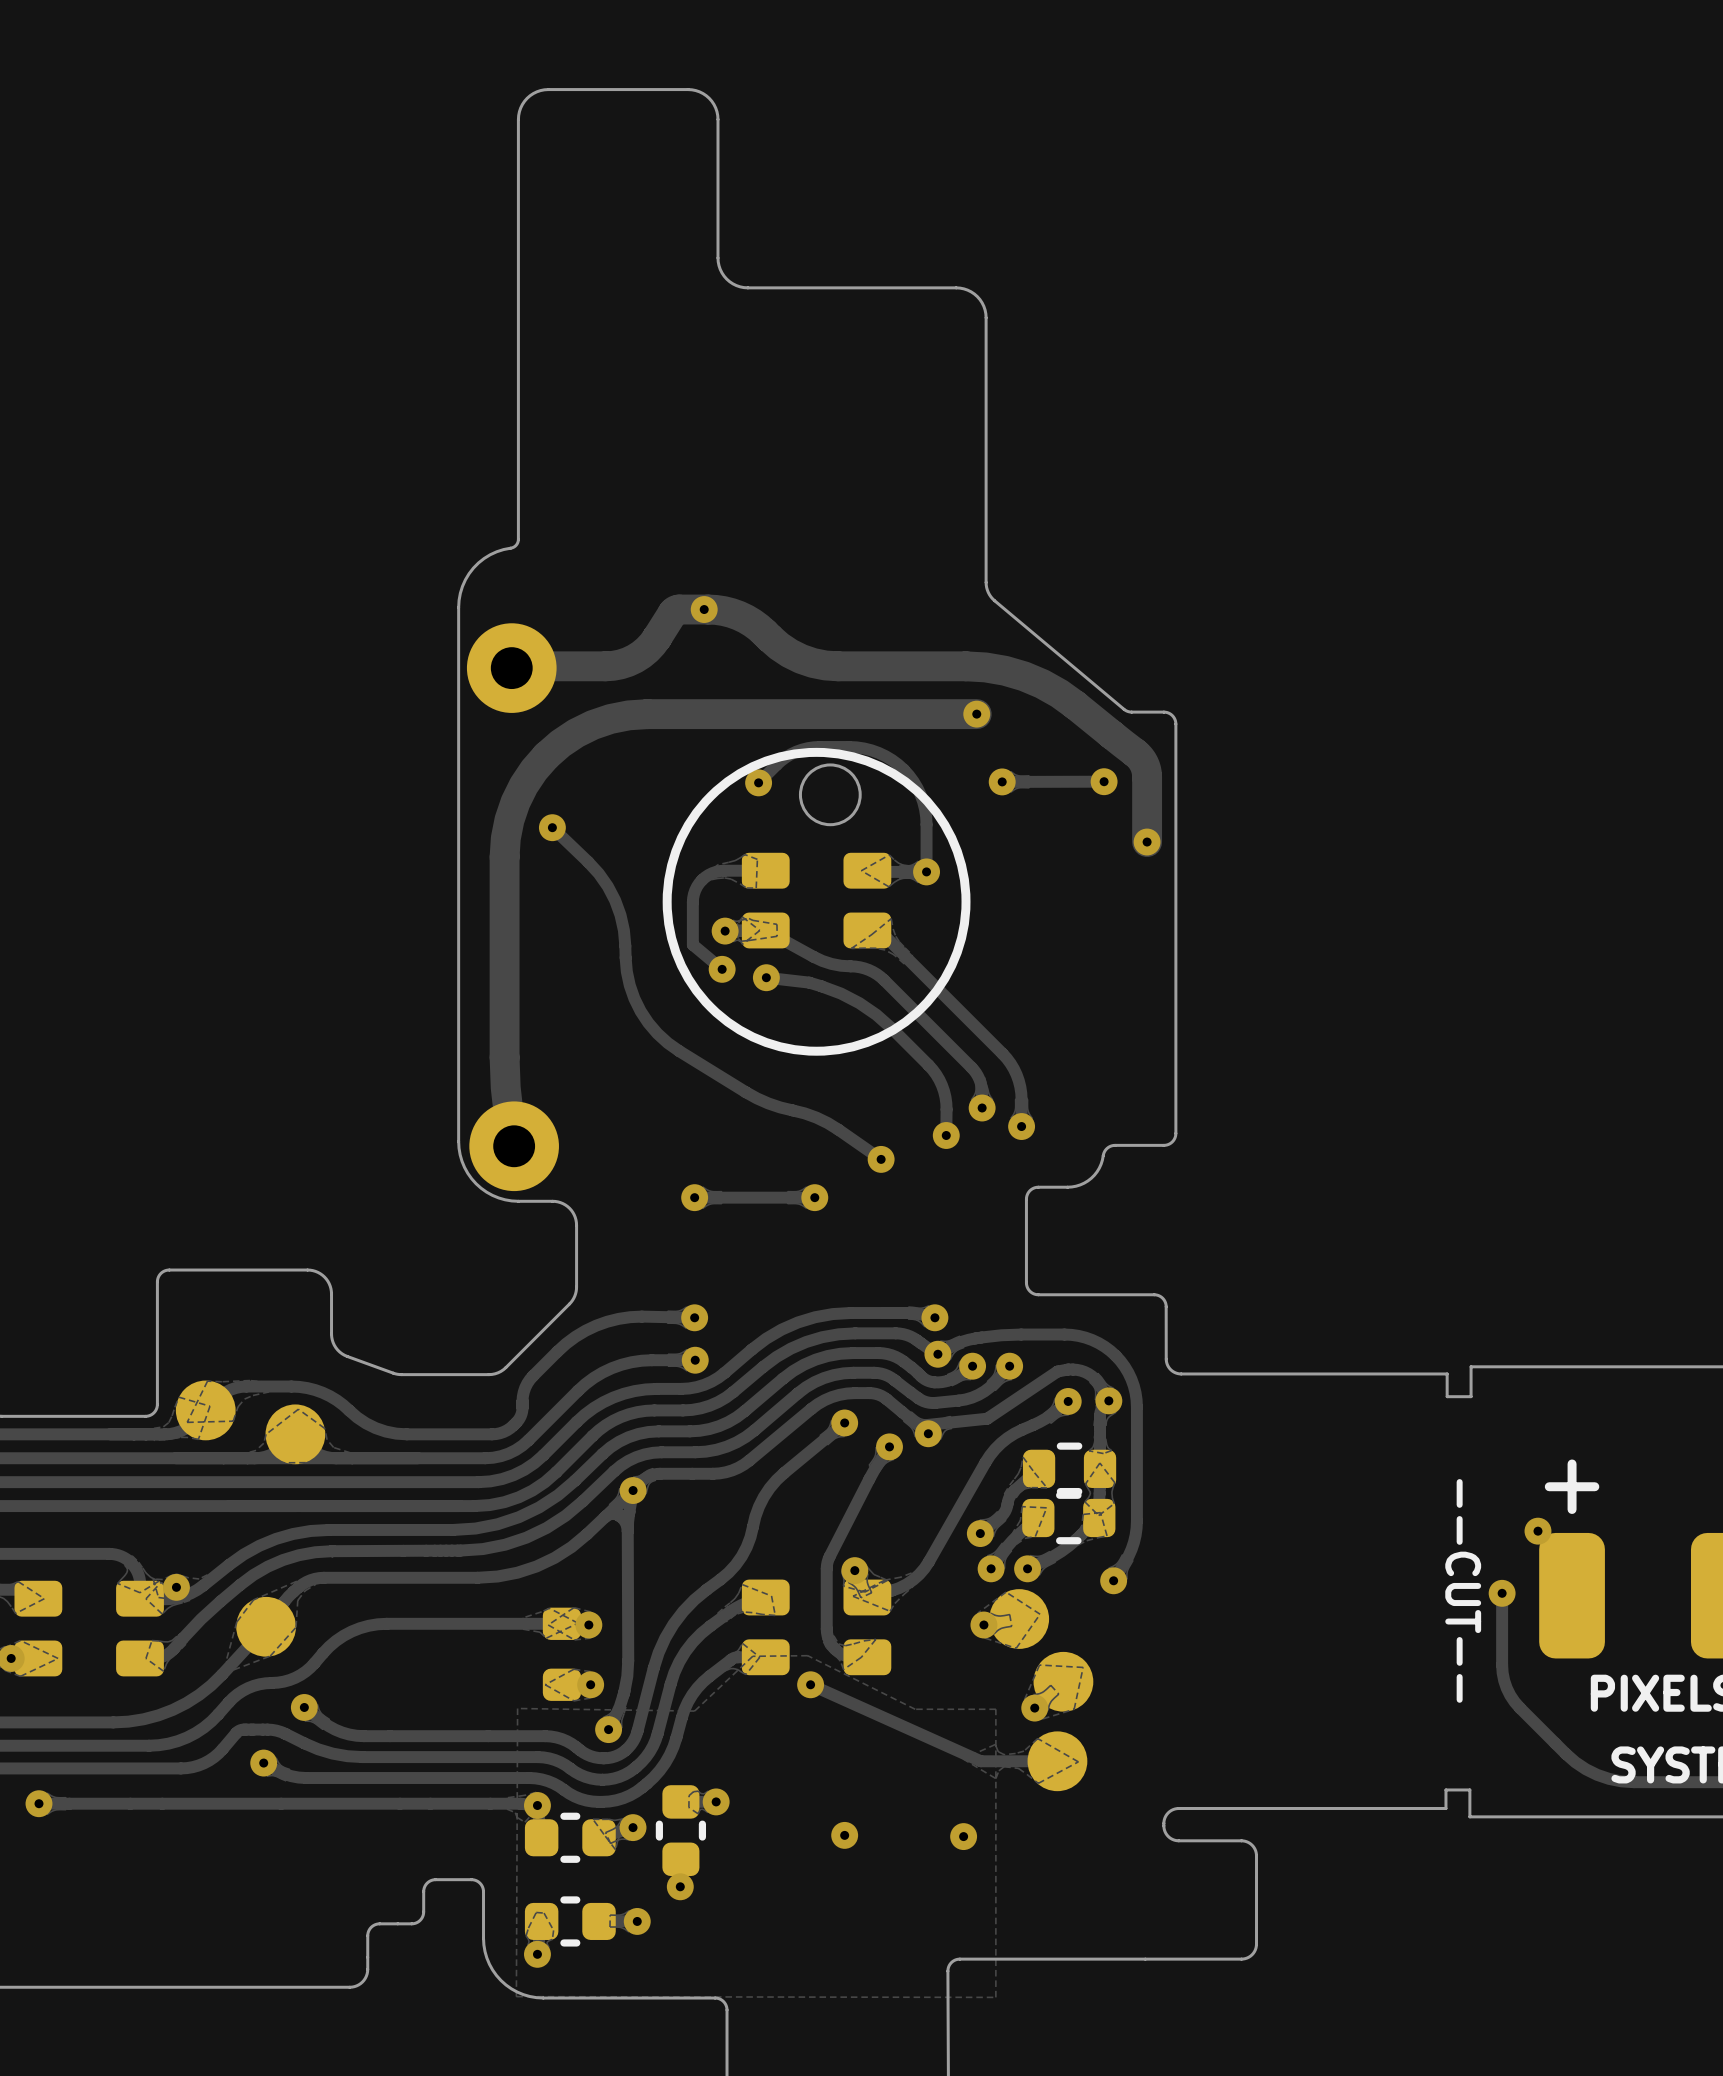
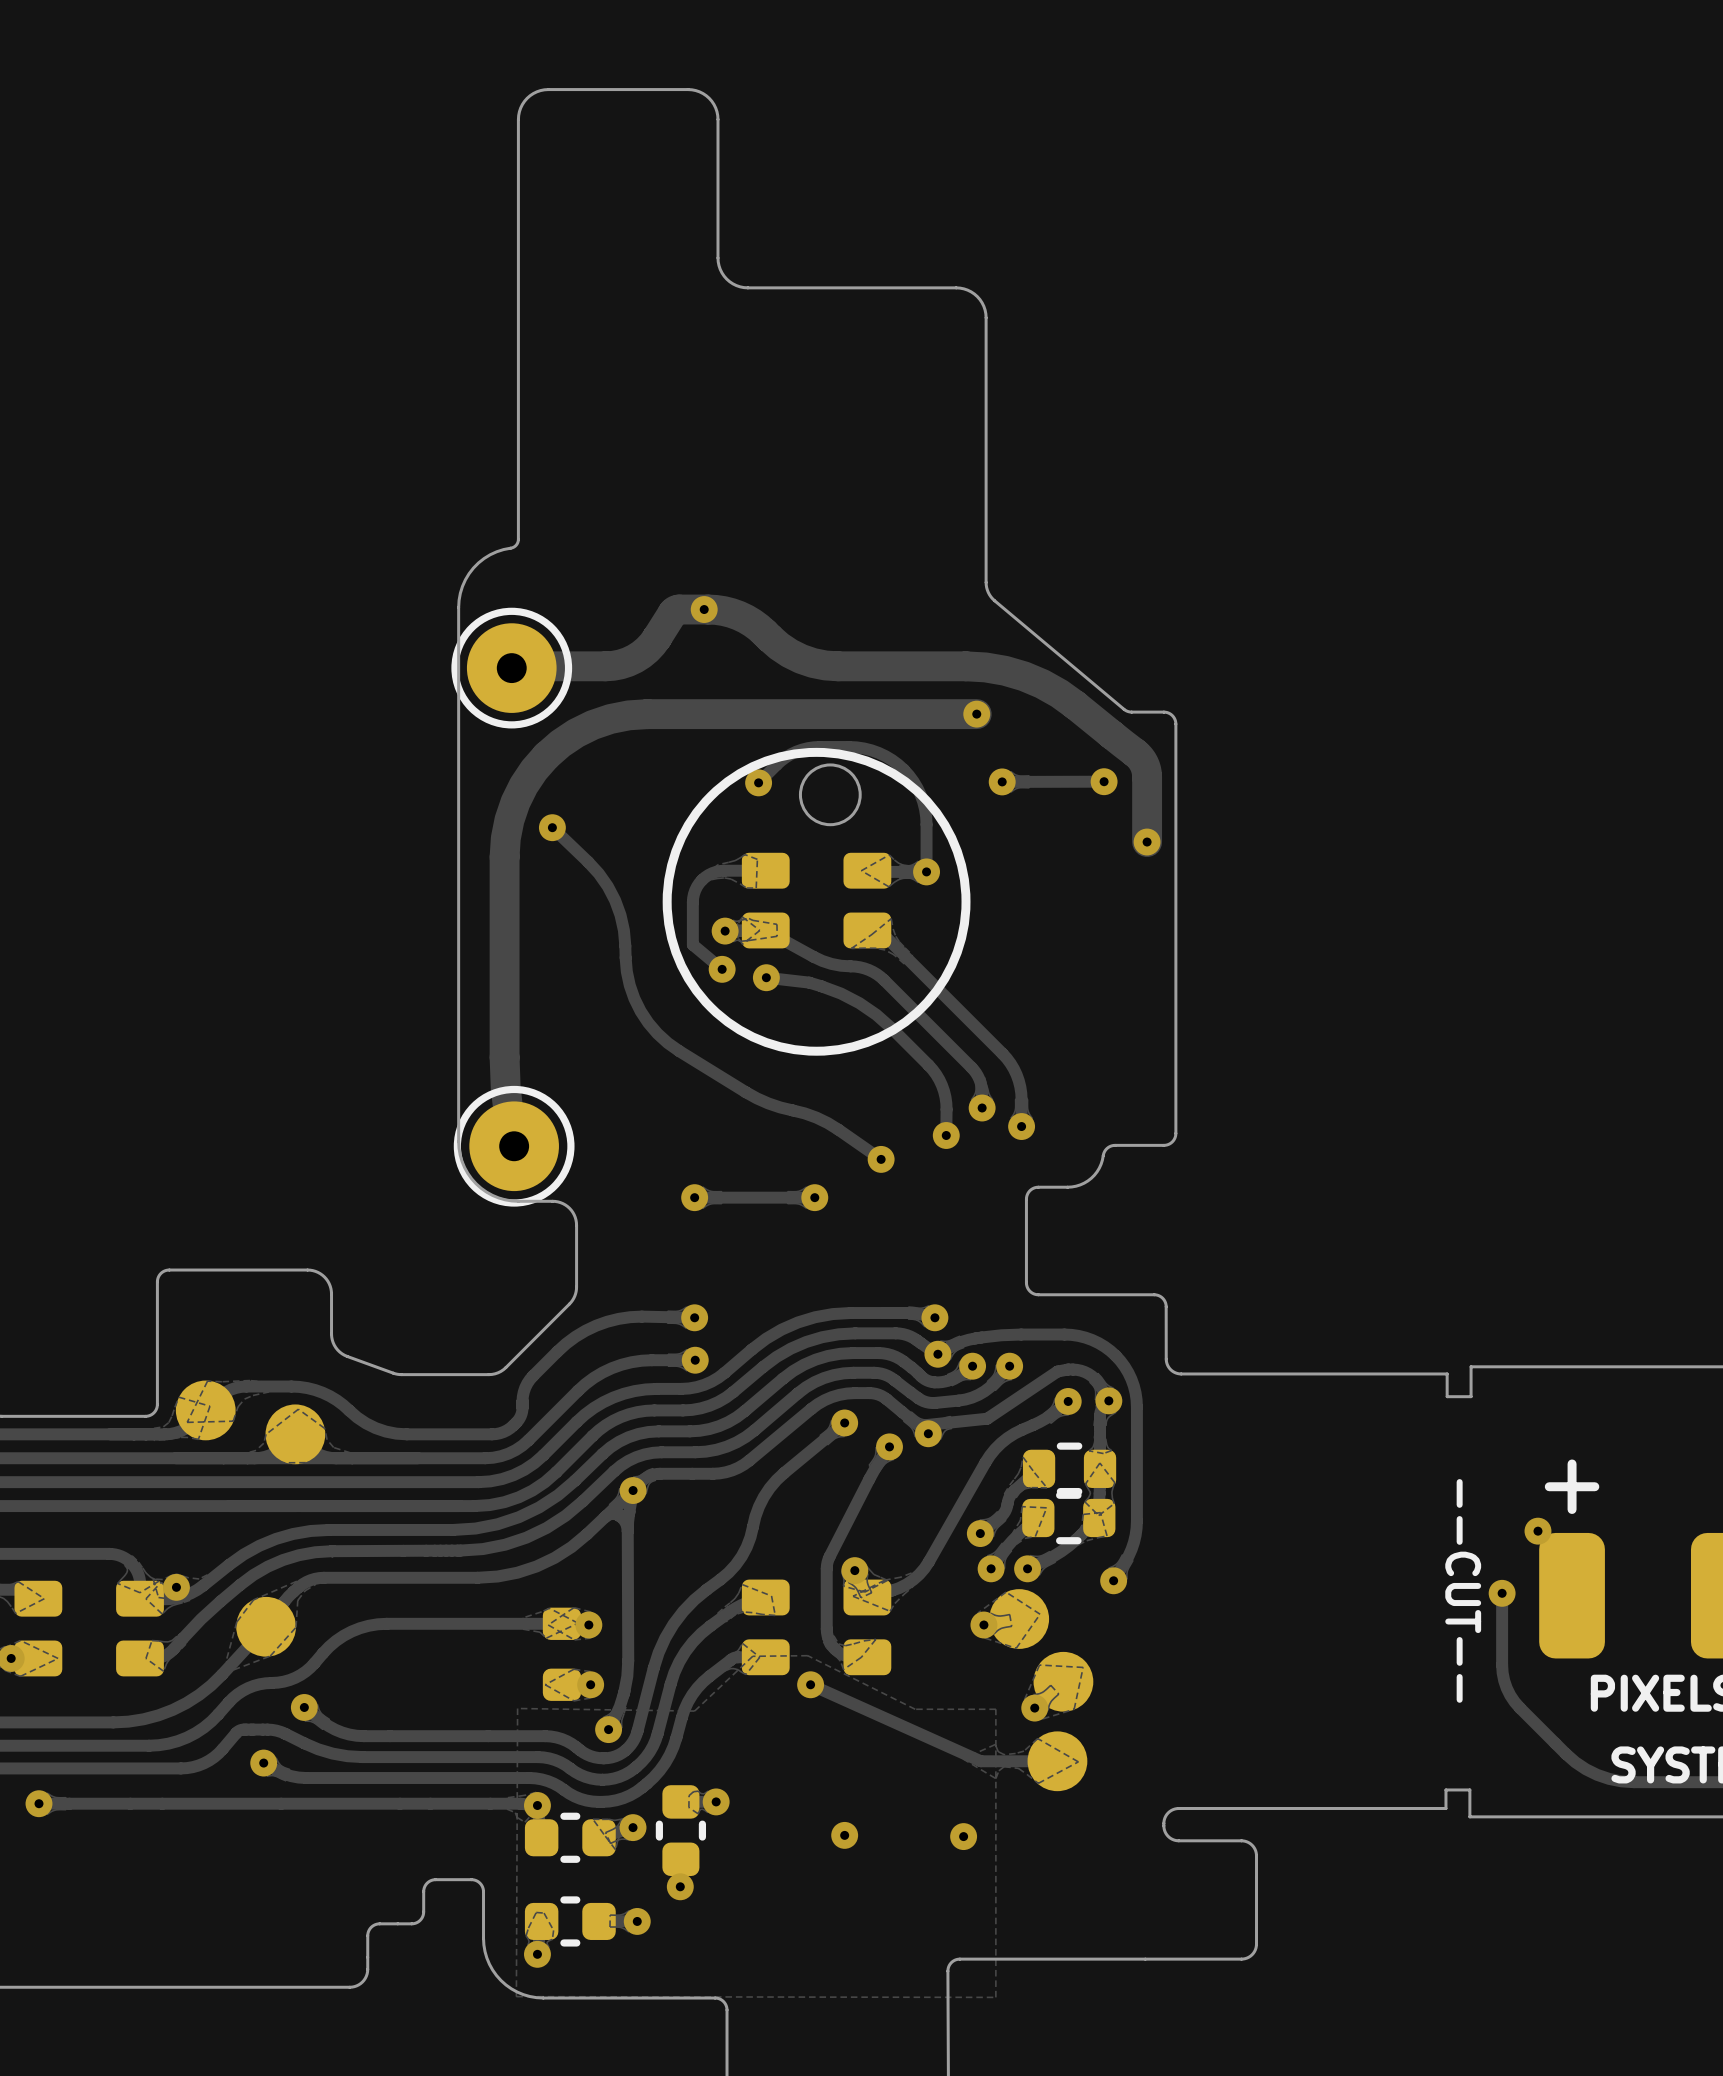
part footprint: [466, 623, 557, 713] -> [451, 607, 573, 729]
part footprint: [469, 1101, 559, 1192] -> [453, 1085, 575, 1207]

